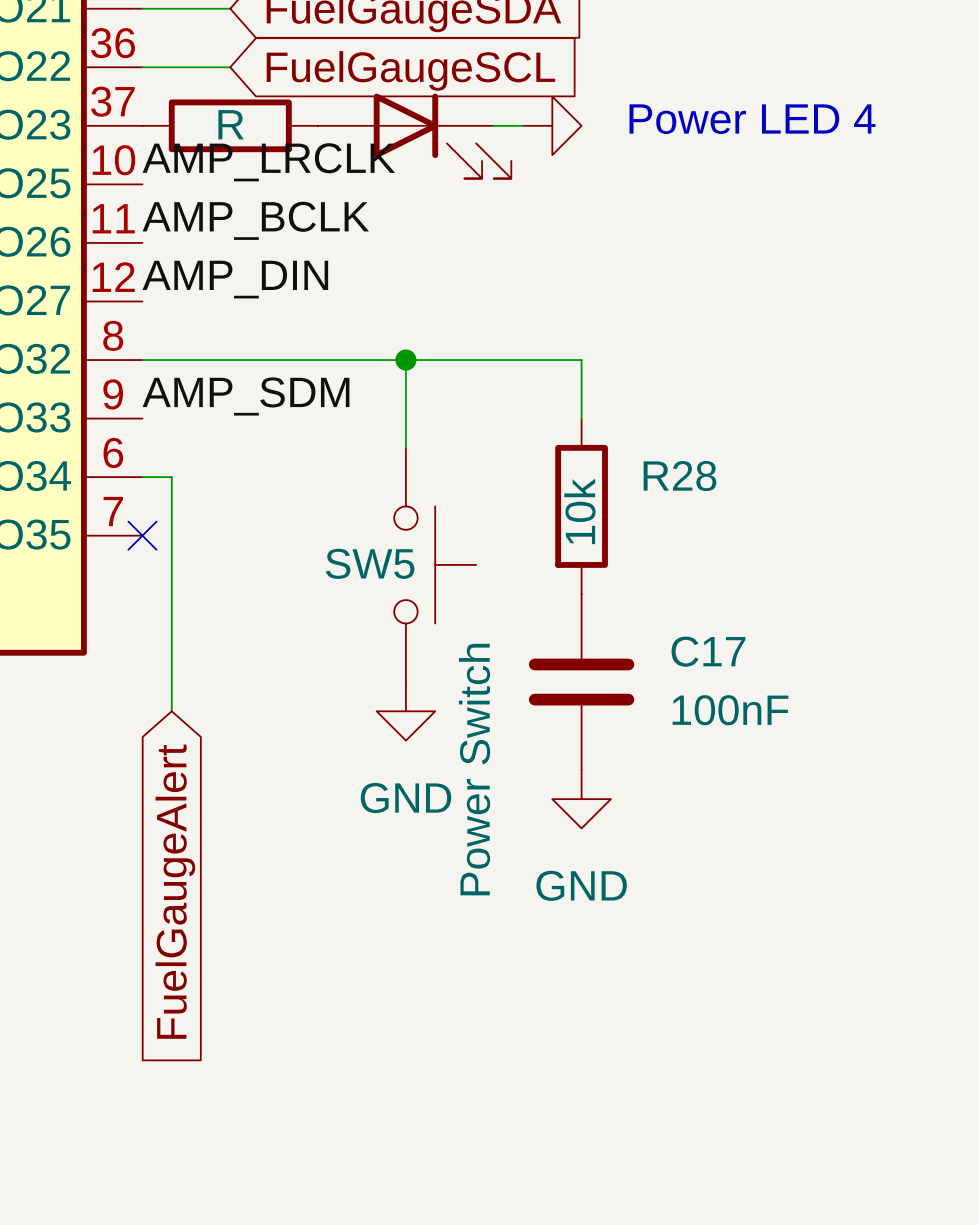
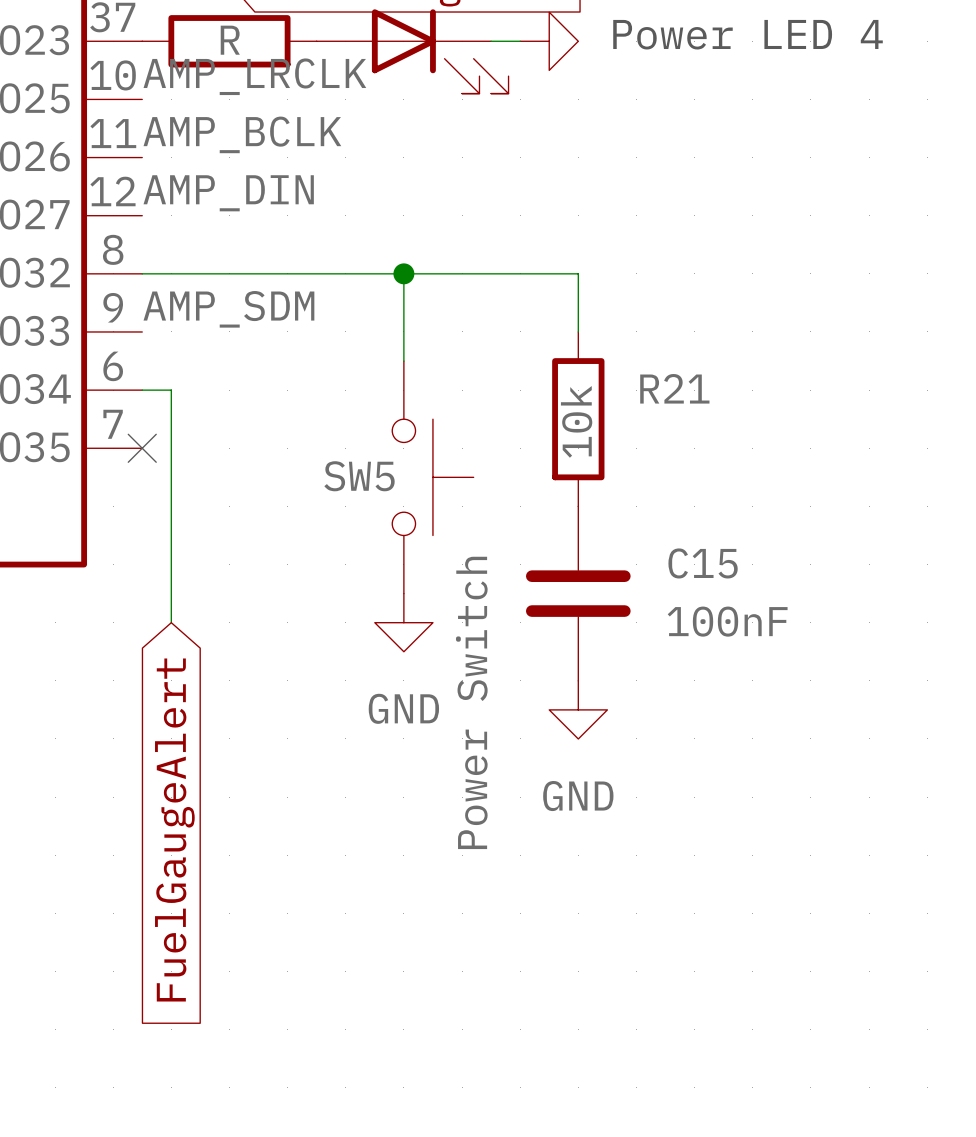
R28 name: R28 (679, 476) -> R21 (674, 388)
C17 name: C17 (708, 651) -> C15 (703, 563)

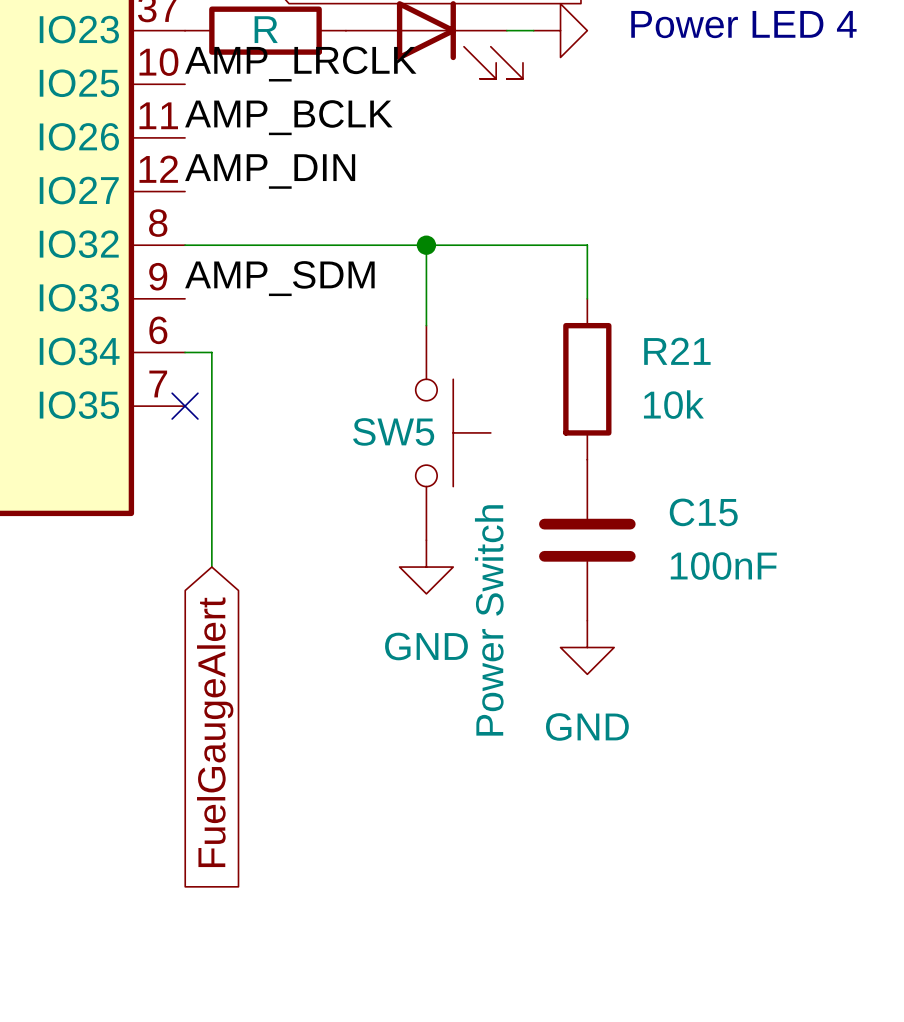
R21 value rotation: 0° (576, 421) -> 90° clockwise (673, 404)
R21 value position: 10k (576, 421) -> 10k (673, 404)

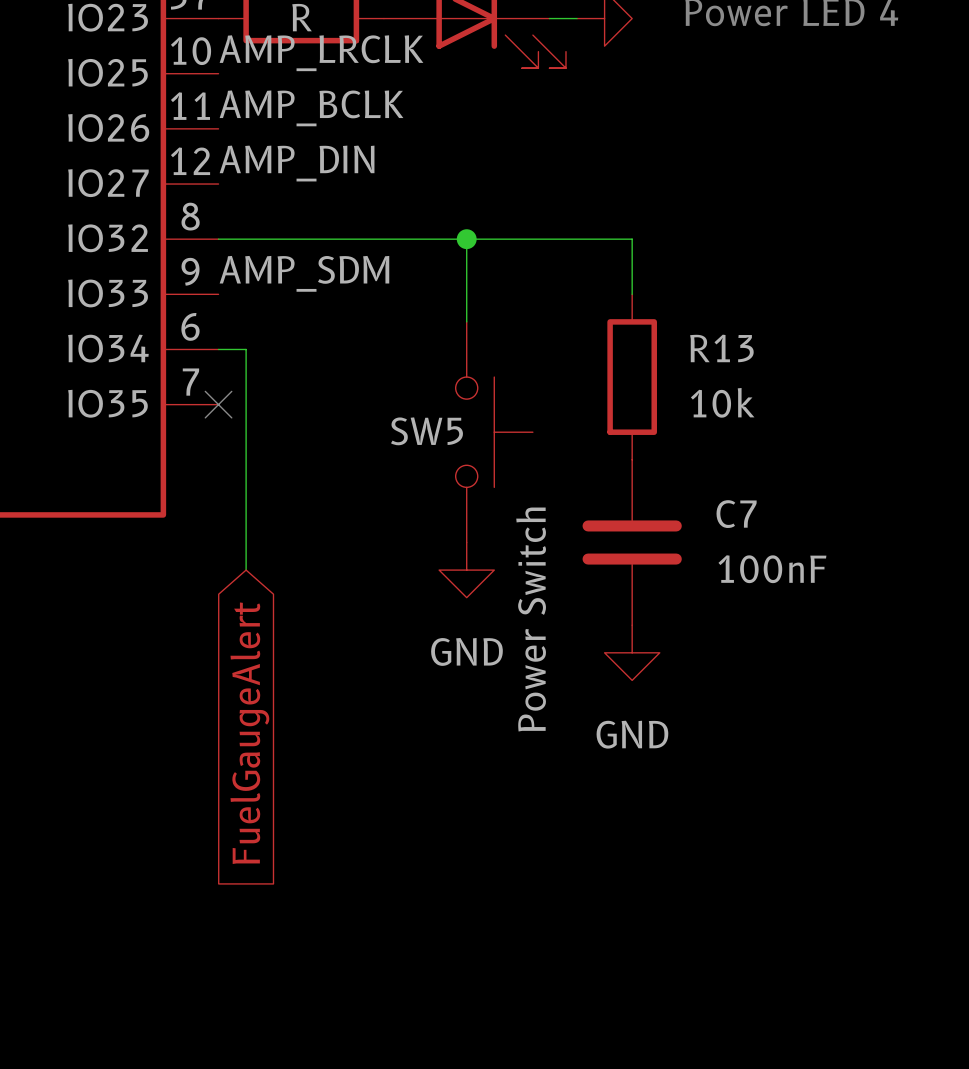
R21 name: R21 (677, 351) -> R13 (721, 348)
C15 name: C15 (703, 512) -> C7 (736, 514)

